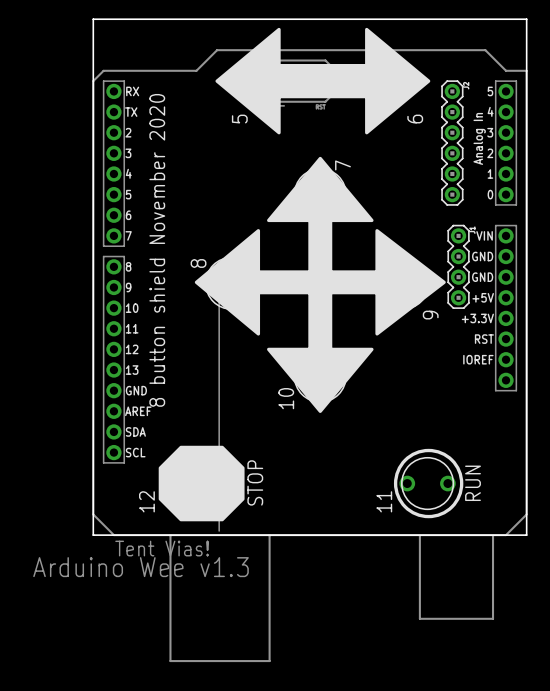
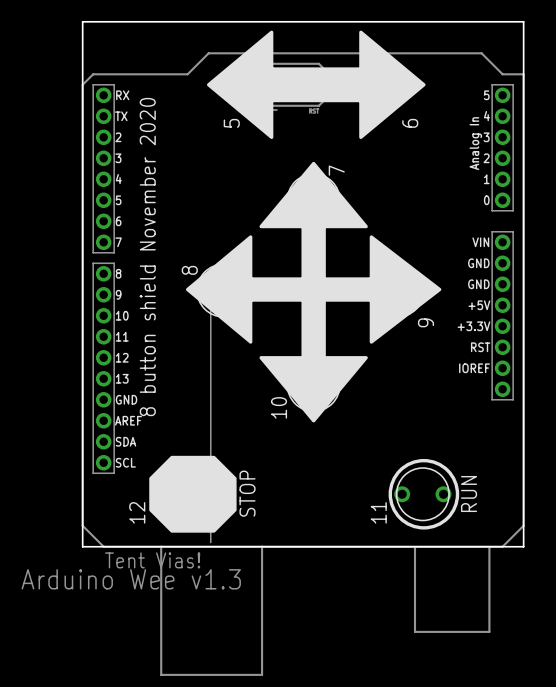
part: (452, 143) -> none
part: (458, 266) -> none

